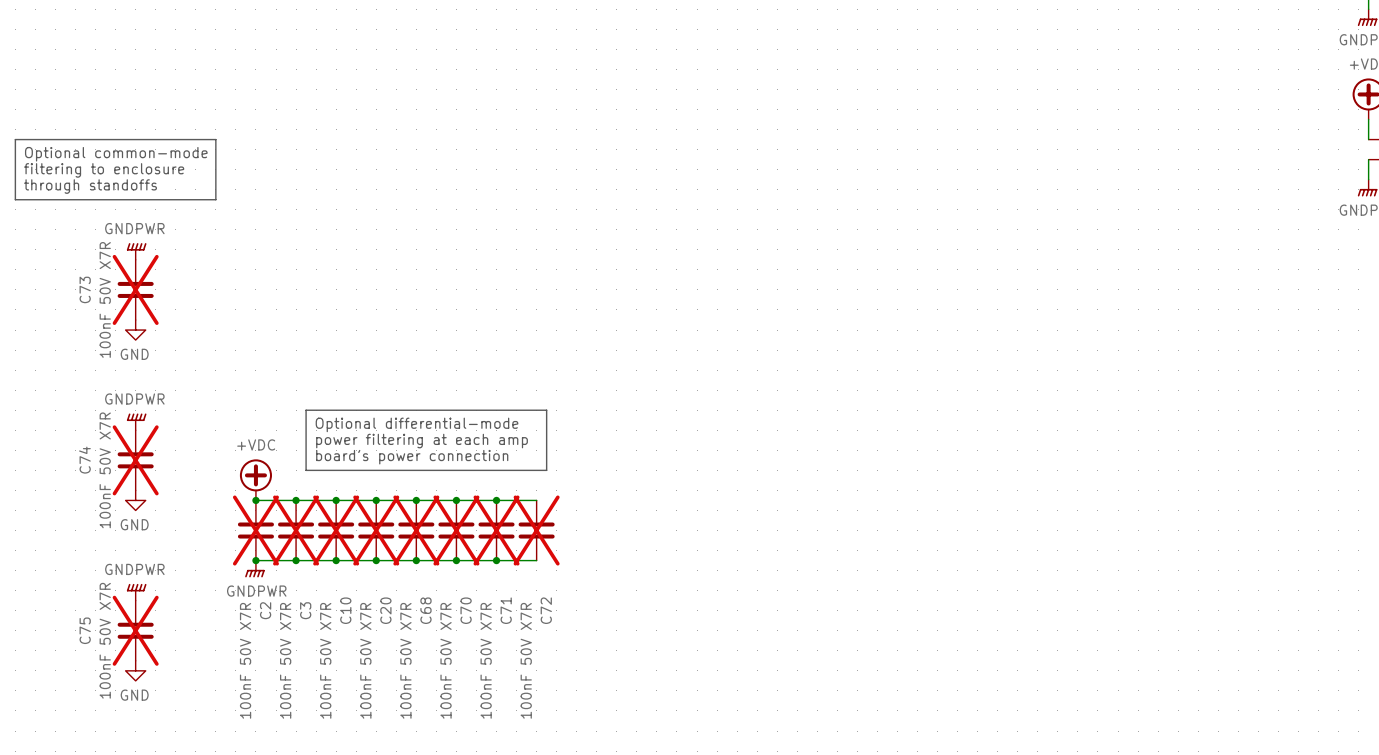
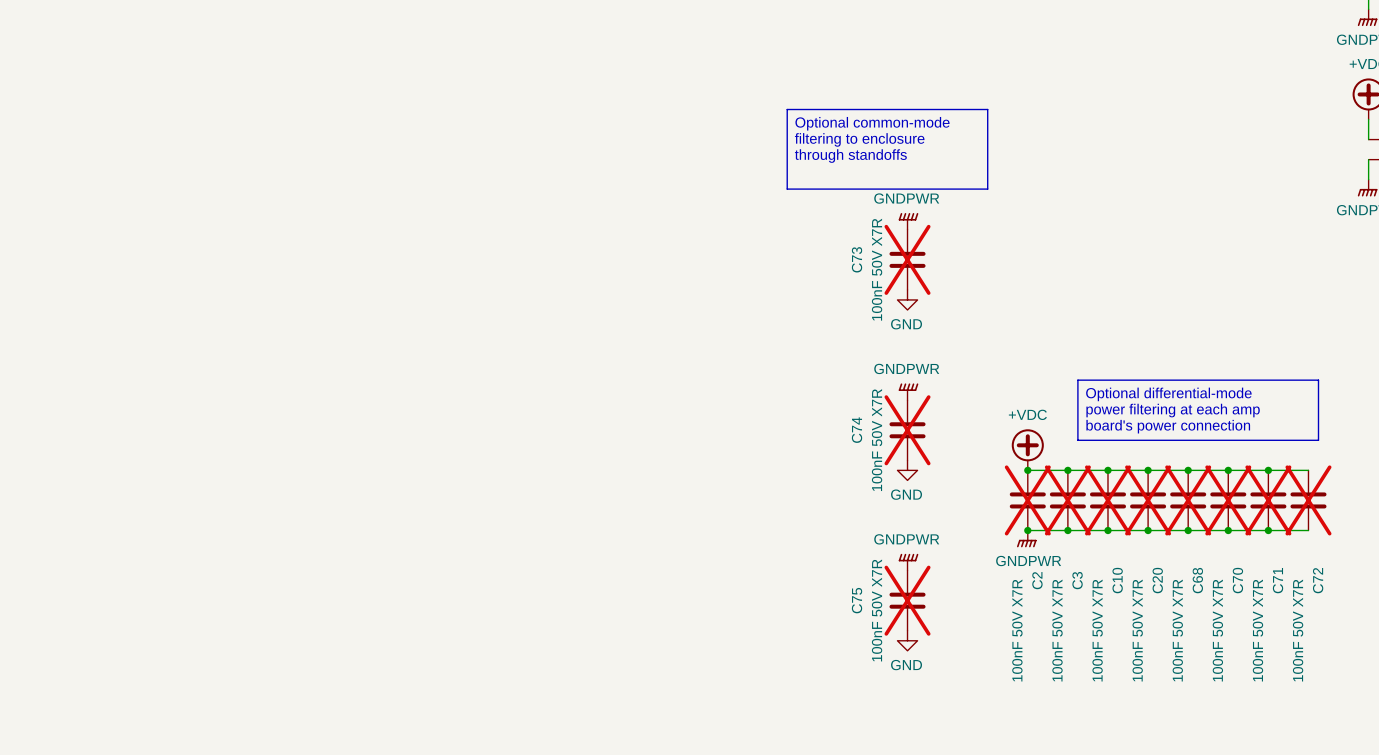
line: none -> (787, 109) (987, 109) (987, 189) (787, 189) (787, 109)
text: none -> Optional common-mode (872, 123)
line: (15, 139) (215, 139) (215, 199) (15, 199) (15, 139) -> none
text: none -> filtering to enclosure (859, 139)
text: Optional common-mode (116, 154) -> none
text: none -> through standoffs (850, 156)
text: filtering to enclosure (104, 170) -> none
text: through standoffs (90, 186) -> none
power symbol: none -> GNDPWR (908, 221)
power symbol: GNDPWR (136, 251) -> none
C73 position: (135, 289) -> (907, 259)
power symbol: none -> GND (907, 299)
power symbol: GND (135, 330) -> none
line: none -> (1077, 380) (1318, 380) (1318, 440) (1077, 440) (1077, 380)
power symbol: none -> GNDPWR (908, 391)
text: none -> Optional differential-mode (1168, 394)
line: (306, 410) (546, 410) (546, 470) (306, 470) (306, 410) -> none
text: none -> power filtering at each amp (1173, 410)
power symbol: GNDPWR (136, 421) -> none
text: Optional differential-mode (417, 424) -> none
text: none -> board's power connection (1168, 426)
text: power filtering at each amp (422, 441) -> none
power symbol: none -> +VDC (1027, 449)
text: board's power connection (412, 457) -> none
C74 position: (135, 460) -> (907, 430)
power symbol: none -> GND (907, 470)
wire: none -> (1027, 470) (1308, 470)
junction: none -> (1027, 470)
junction: none -> (1067, 470)
junction: none -> (1107, 470)
junction: none -> (1148, 470)
junction: none -> (1188, 470)
junction: none -> (1228, 470)
junction: none -> (1268, 470)
power symbol: +VDC (255, 479) -> none
power symbol: GND (135, 500) -> none
wire: (255, 500) (536, 500) -> none
junction: (255, 500) -> none
junction: (296, 500) -> none
junction: (336, 500) -> none
junction: (376, 500) -> none
junction: (416, 500) -> none
junction: (456, 500) -> none
junction: (496, 500) -> none
C2 position: (255, 530) -> (1027, 500)
C3 position: (296, 530) -> (1067, 500)
C10 position: (336, 530) -> (1107, 500)
C20 position: (376, 530) -> (1148, 500)
C68 position: (416, 530) -> (1188, 500)
C70 position: (456, 530) -> (1228, 500)
C71 position: (496, 530) -> (1268, 500)
C72 position: (536, 530) -> (1308, 500)
wire: none -> (1027, 530) (1308, 530)
junction: none -> (1027, 530)
junction: none -> (1067, 530)
junction: none -> (1107, 530)
junction: none -> (1148, 530)
junction: none -> (1188, 530)
junction: none -> (1228, 530)
junction: none -> (1268, 530)
power symbol: none -> GNDPWR (1026, 538)
wire: (255, 560) (536, 560) -> none
junction: (255, 560) -> none
junction: (296, 560) -> none
junction: (336, 560) -> none
junction: (376, 560) -> none
junction: (416, 560) -> none
junction: (456, 560) -> none
junction: (496, 560) -> none
power symbol: none -> GNDPWR (908, 562)
power symbol: GNDPWR (254, 569) -> none
power symbol: GNDPWR (136, 592) -> none
C75 position: (135, 630) -> (907, 600)
power symbol: none -> GND (907, 640)
power symbol: GND (135, 670) -> none

